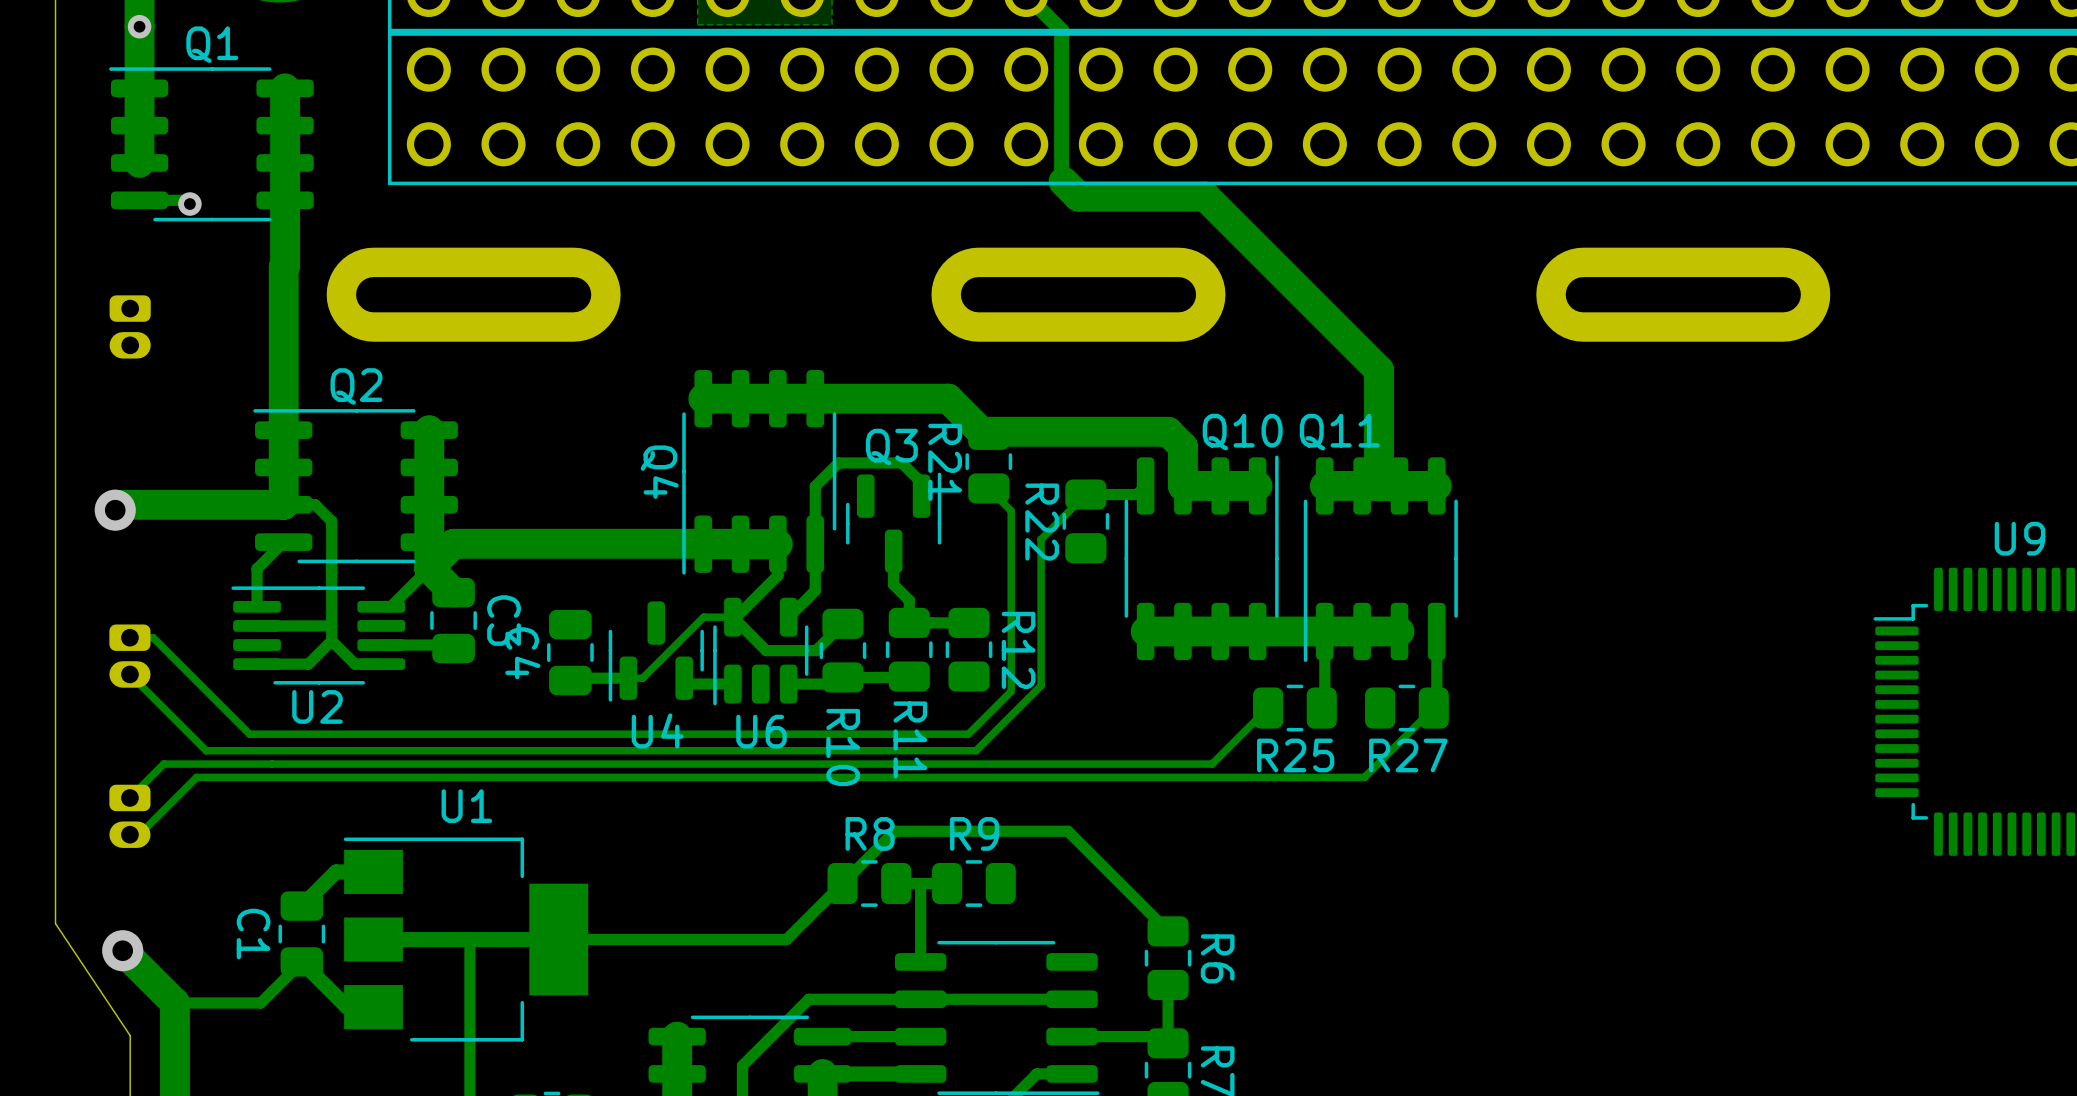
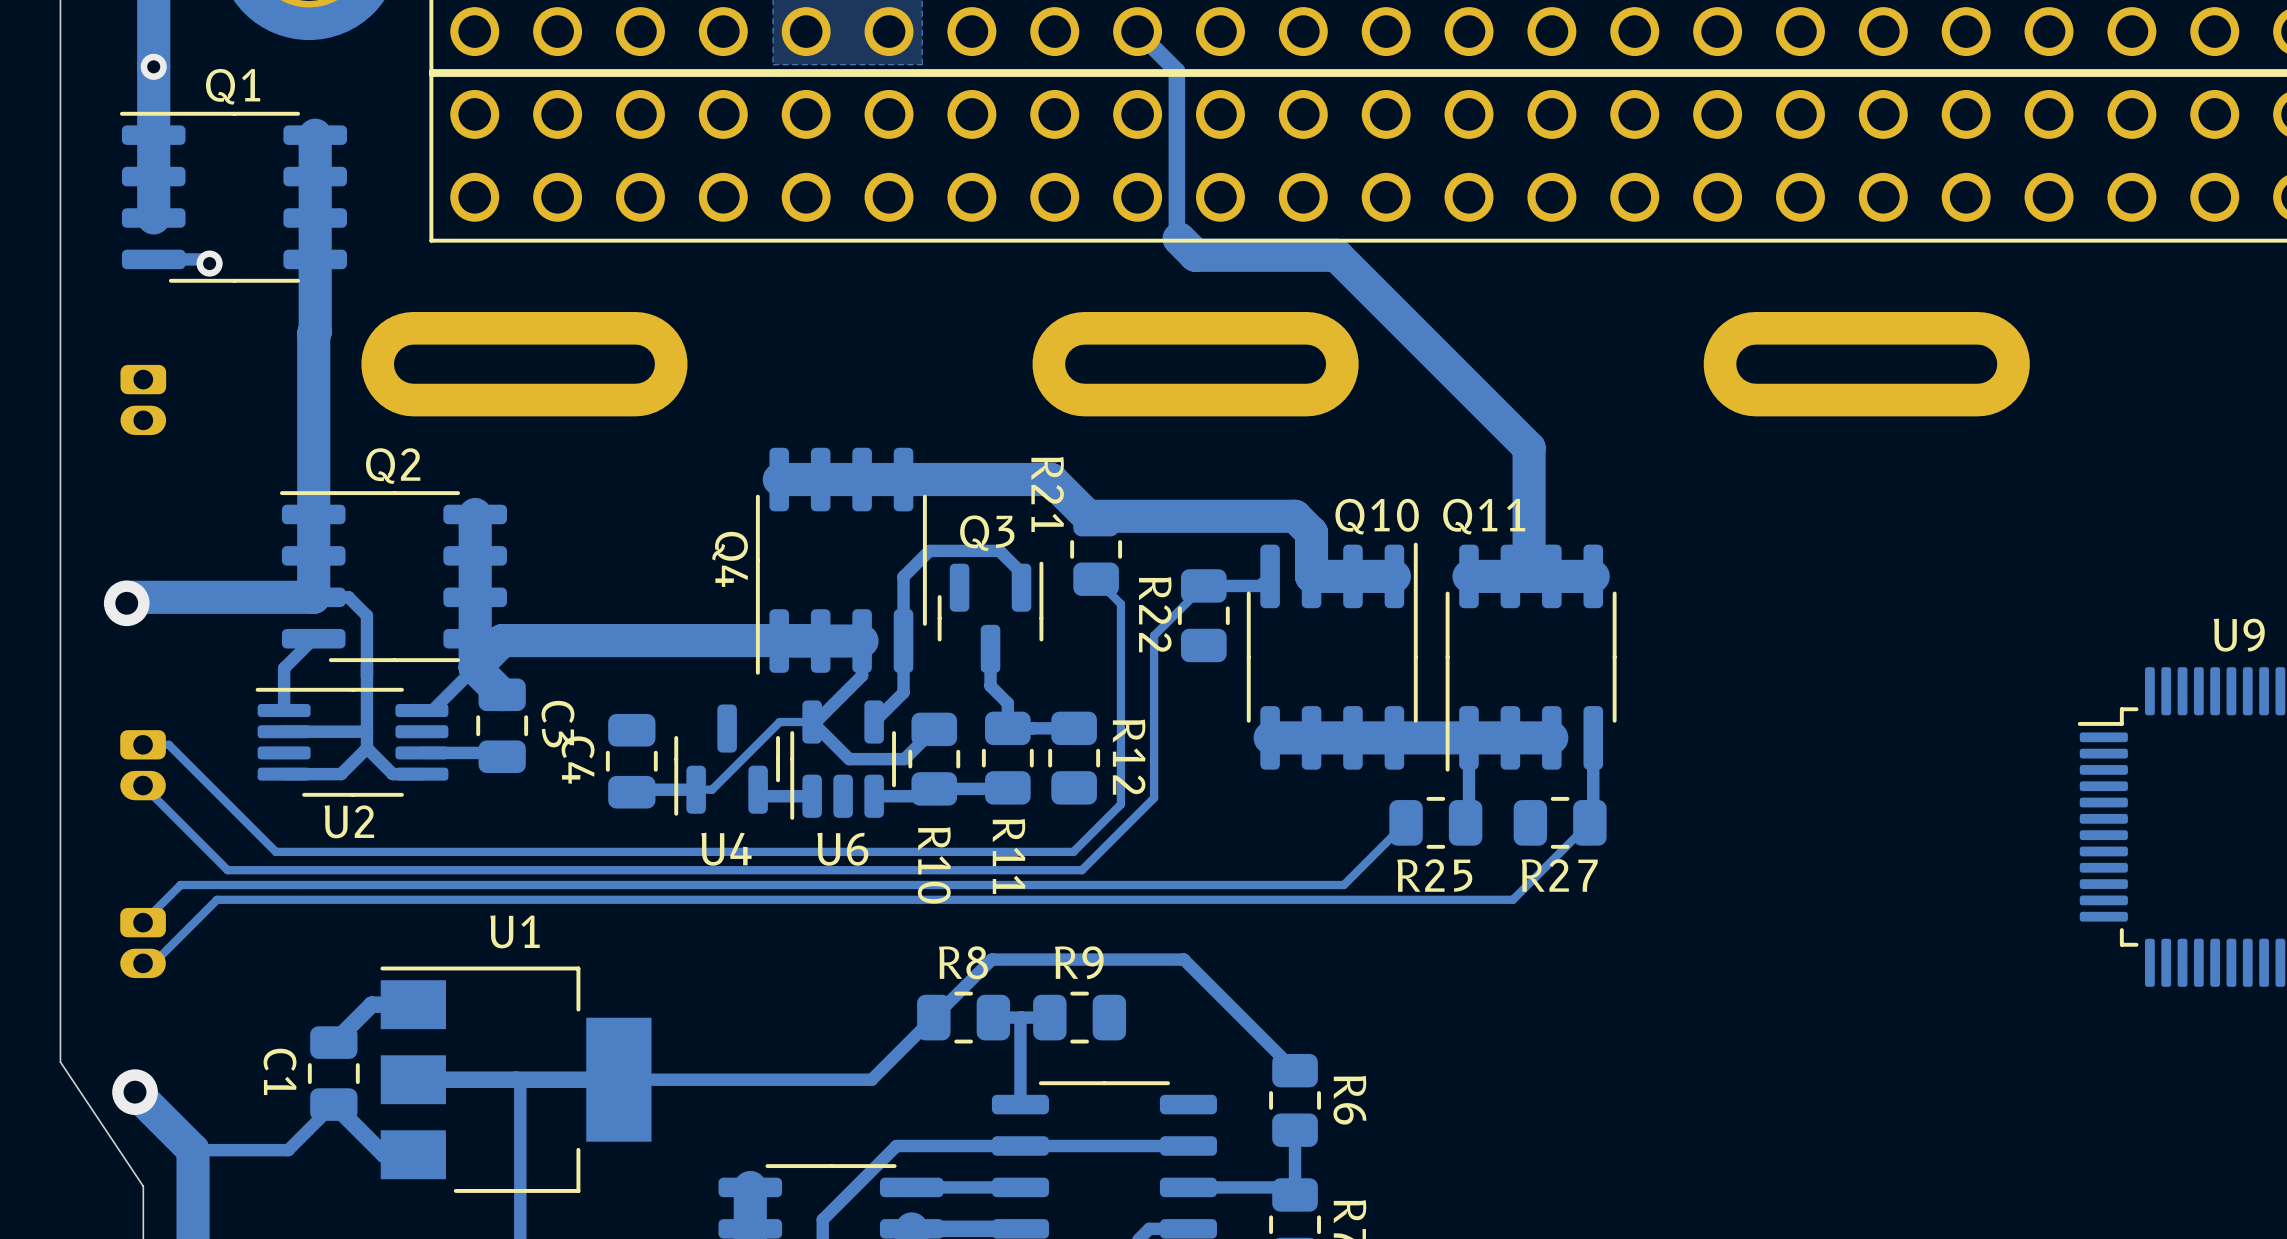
R21 name position: R21 (945, 462) -> R21 (1047, 494)

